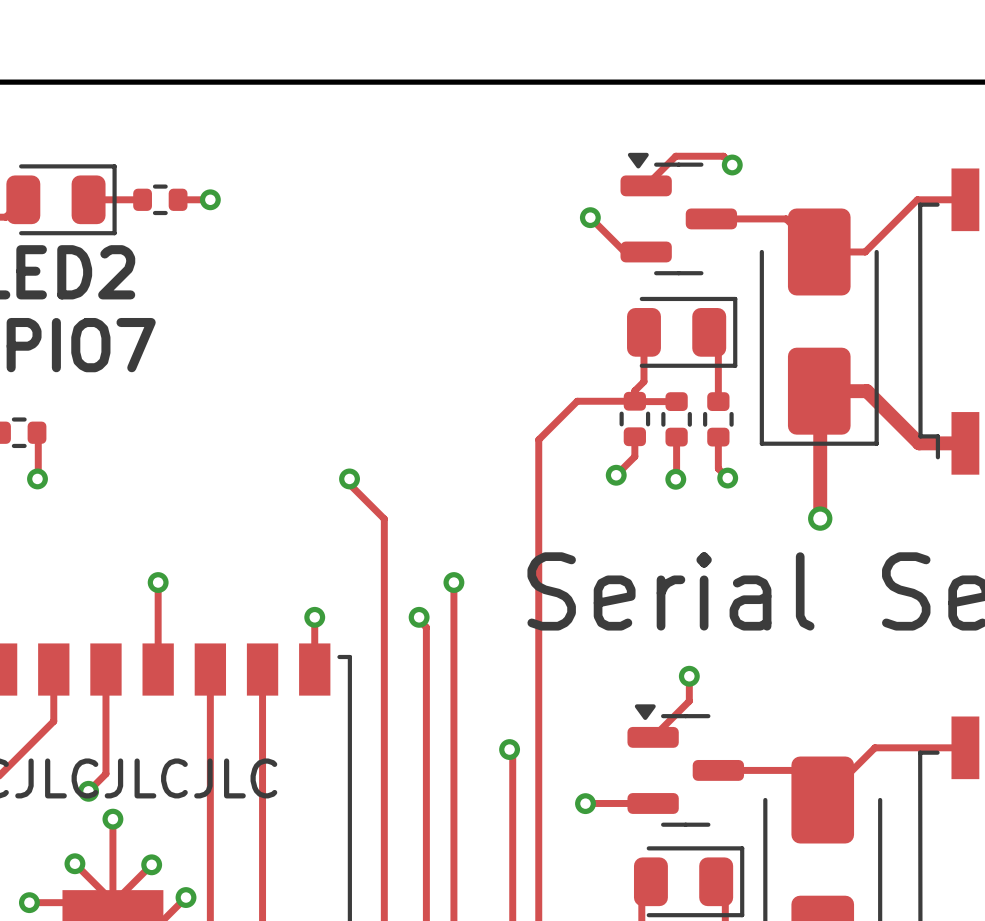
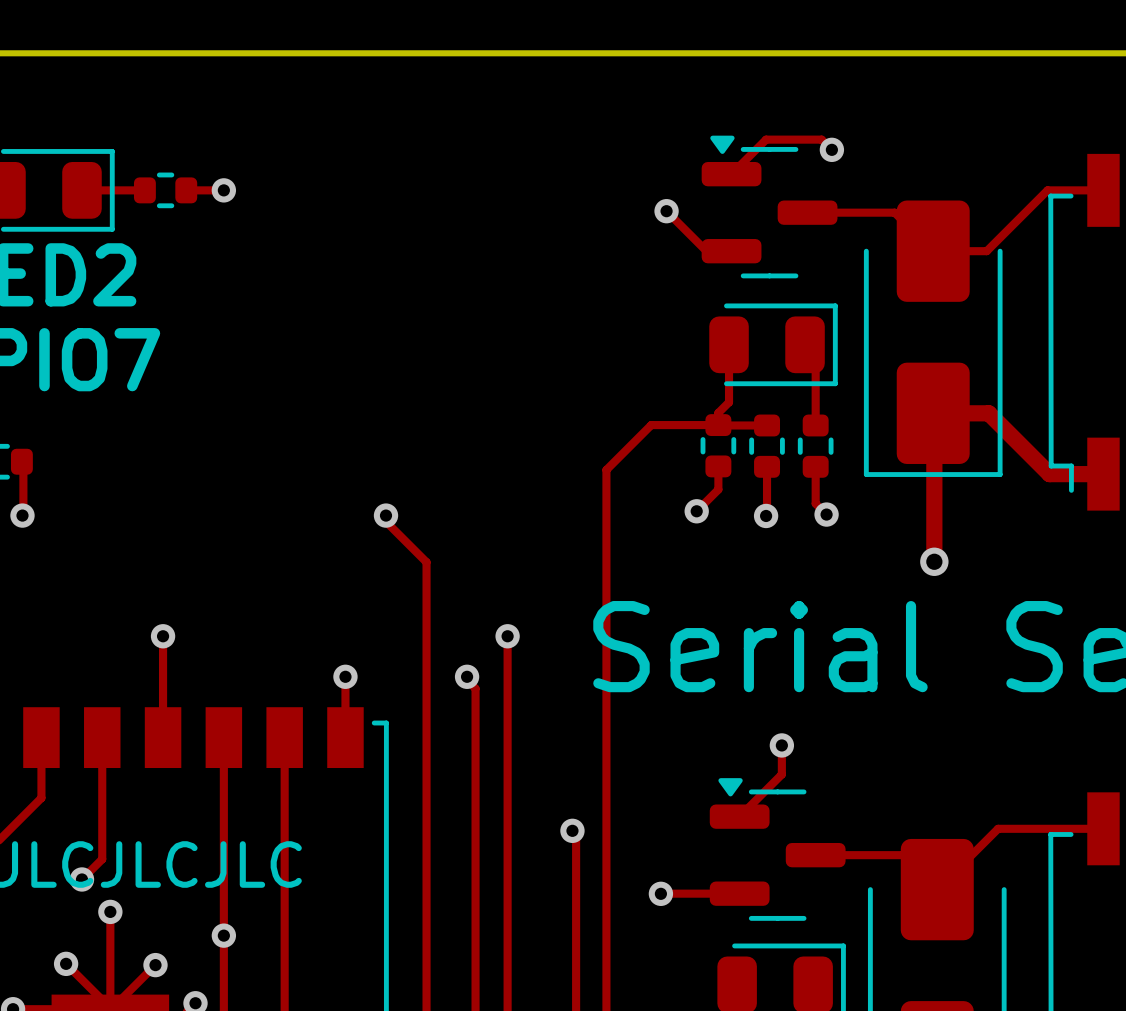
via: none -> (223, 935)

